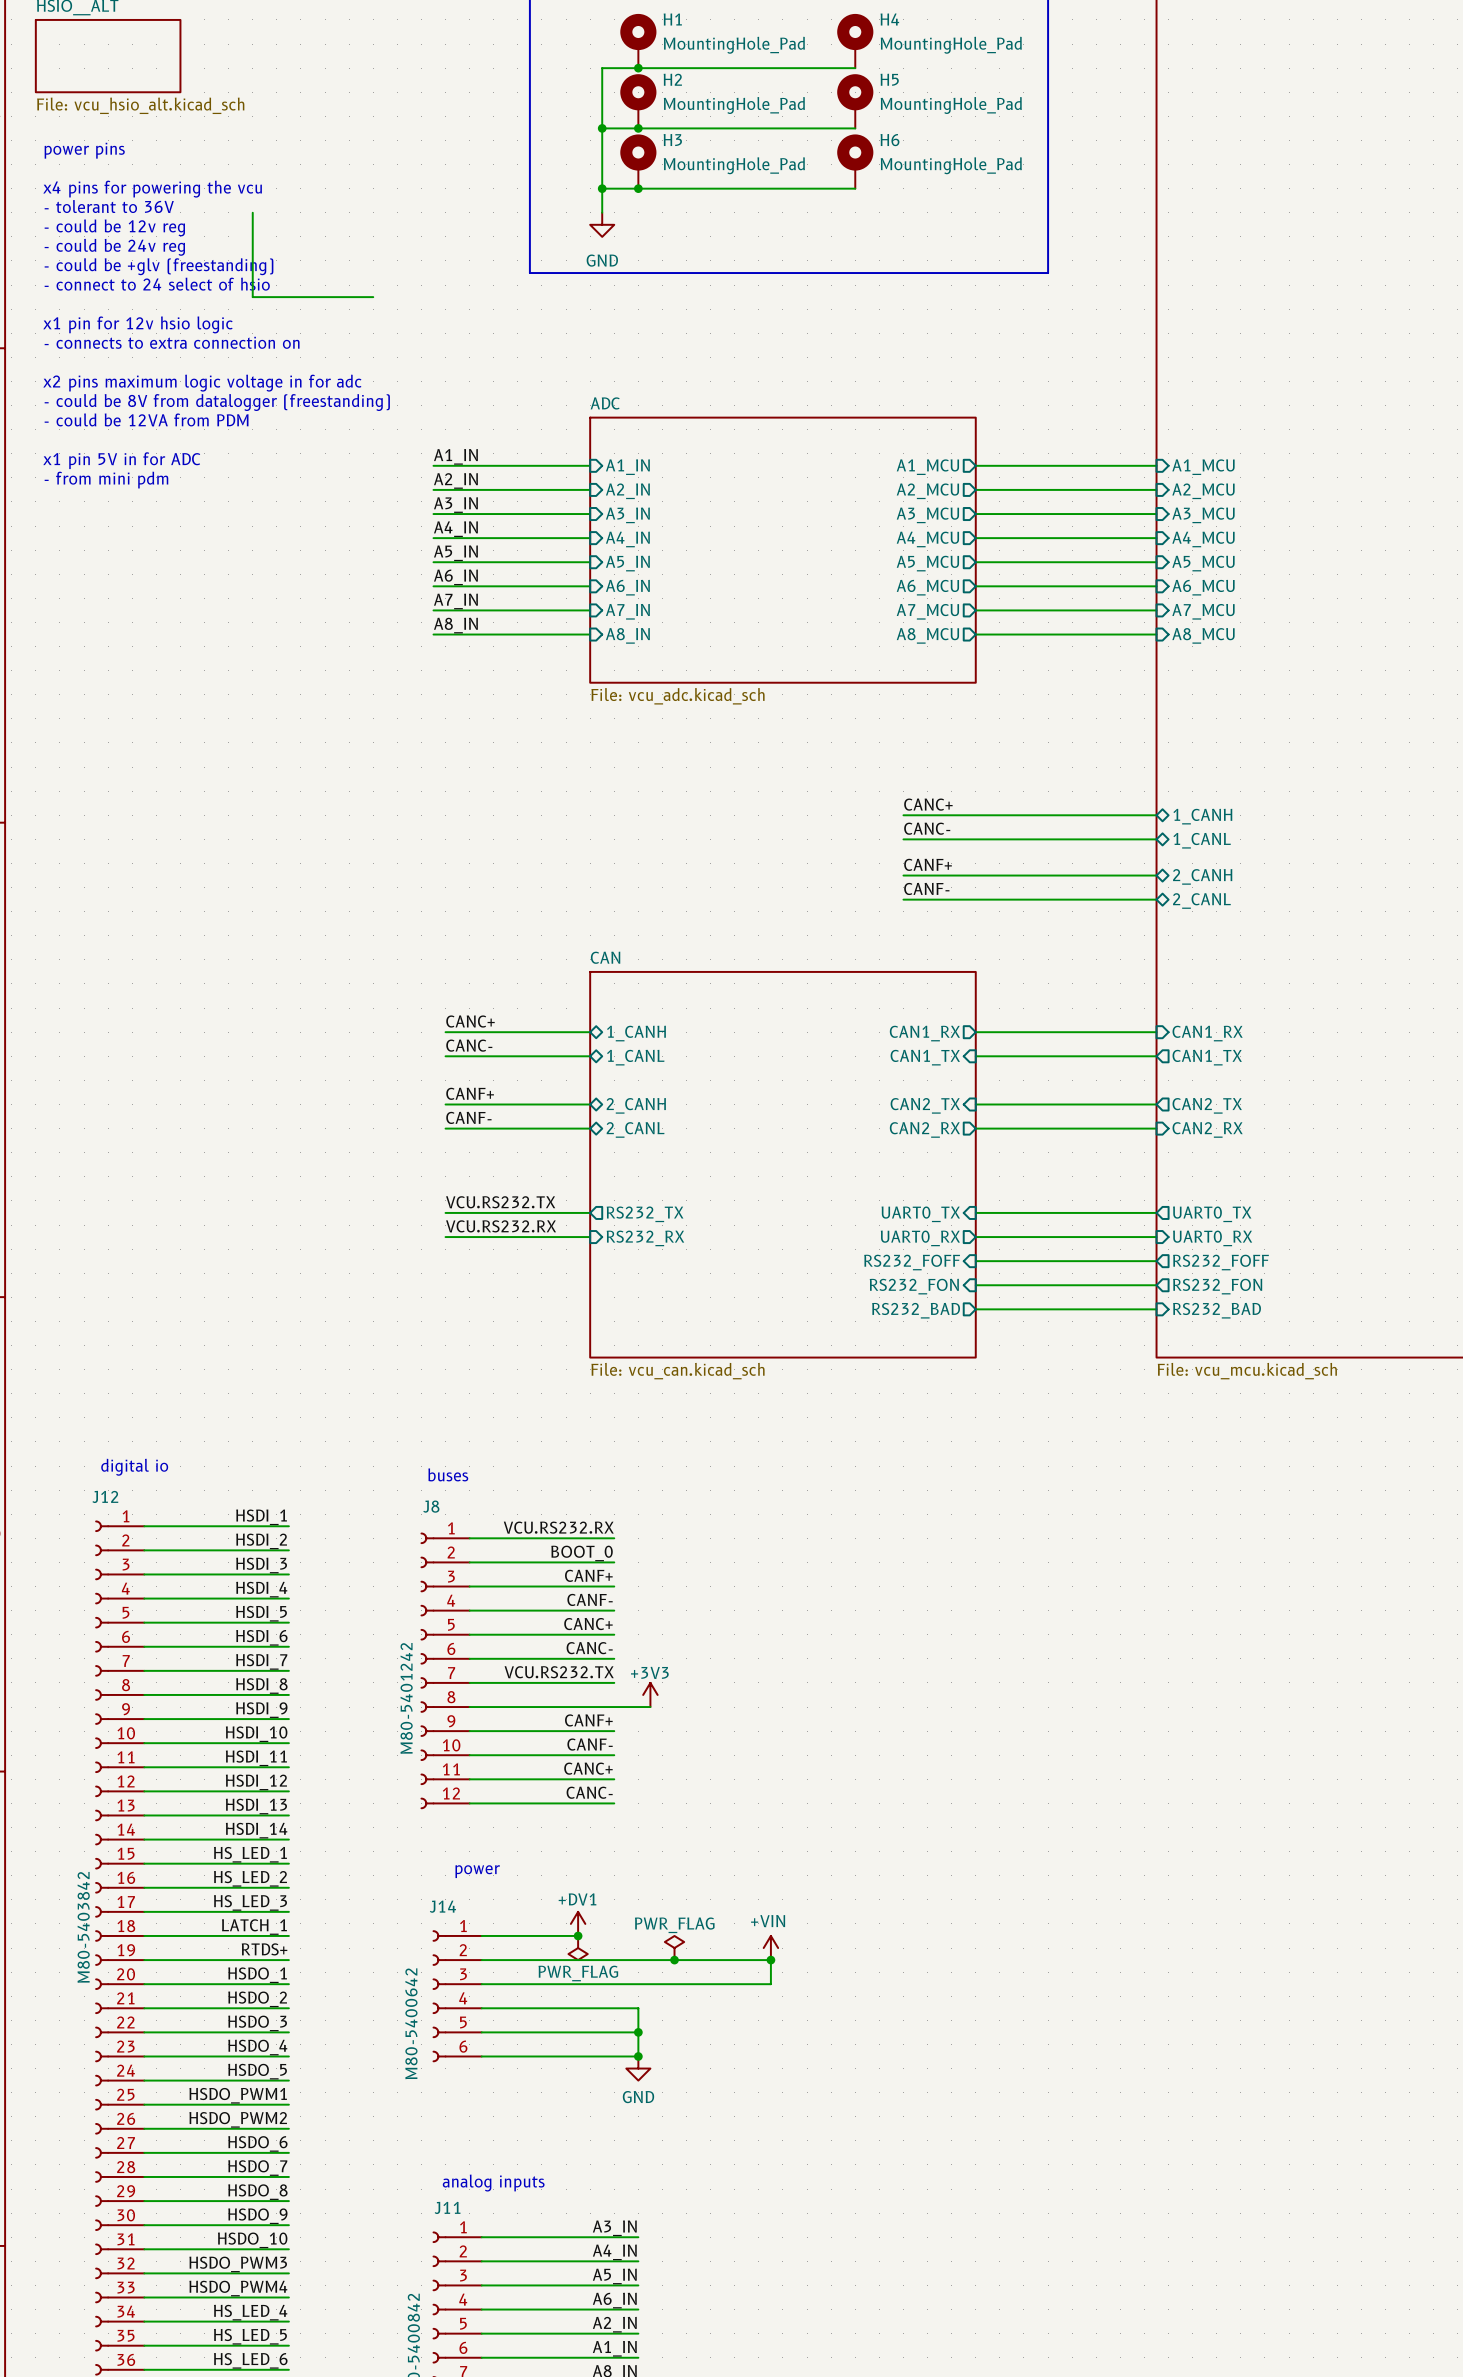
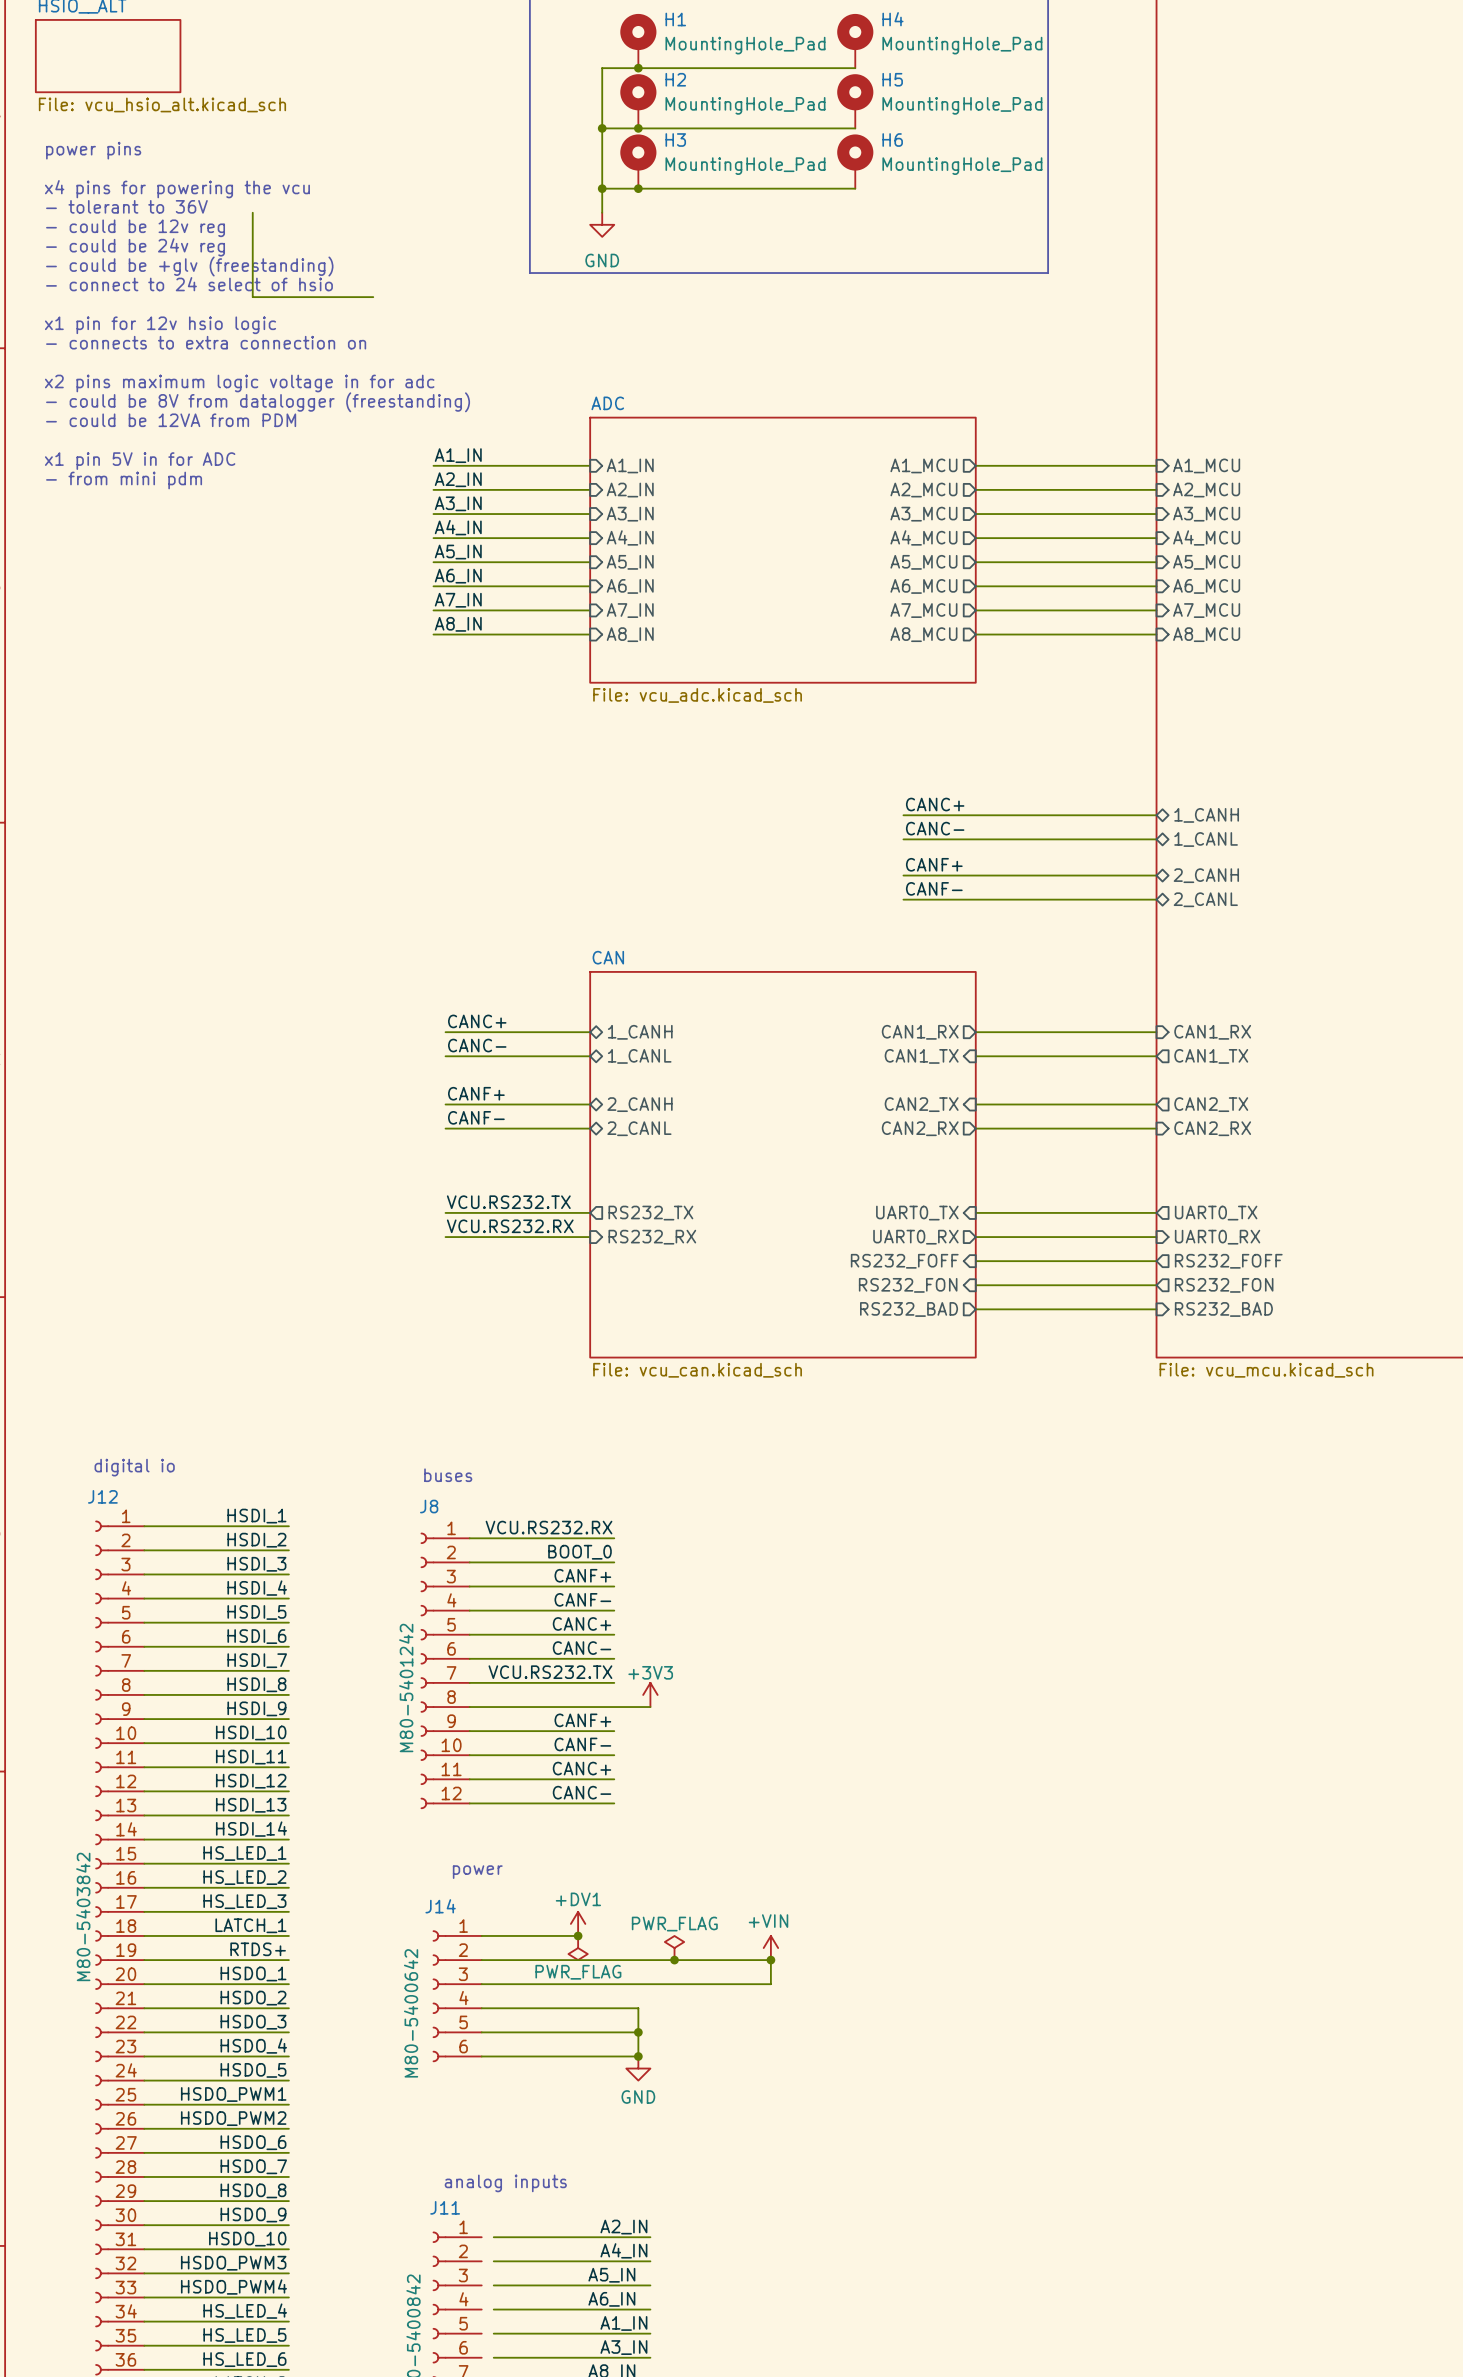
text position: analog inputs (493, 2183) -> analog inputs (505, 2183)
label position: A3_IN (614, 2228) -> A3_IN (623, 2347)
wire: (481, 2237) (493, 2237) -> (638, 2237) (650, 2237)
label position: A4_IN (614, 2252) -> A4_IN (623, 2250)
wire: (481, 2261) (493, 2261) -> (638, 2261) (650, 2261)
wire: (481, 2285) (493, 2285) -> (638, 2285) (650, 2285)
wire: (481, 2309) (493, 2309) -> (638, 2309) (650, 2309)
label position: A2_IN (614, 2324) -> A2_IN (623, 2227)
wire: (481, 2333) (493, 2333) -> (638, 2333) (650, 2333)
label position: A1_IN (614, 2348) -> A1_IN (623, 2323)
wire: (481, 2357) (493, 2357) -> (638, 2357) (650, 2357)

